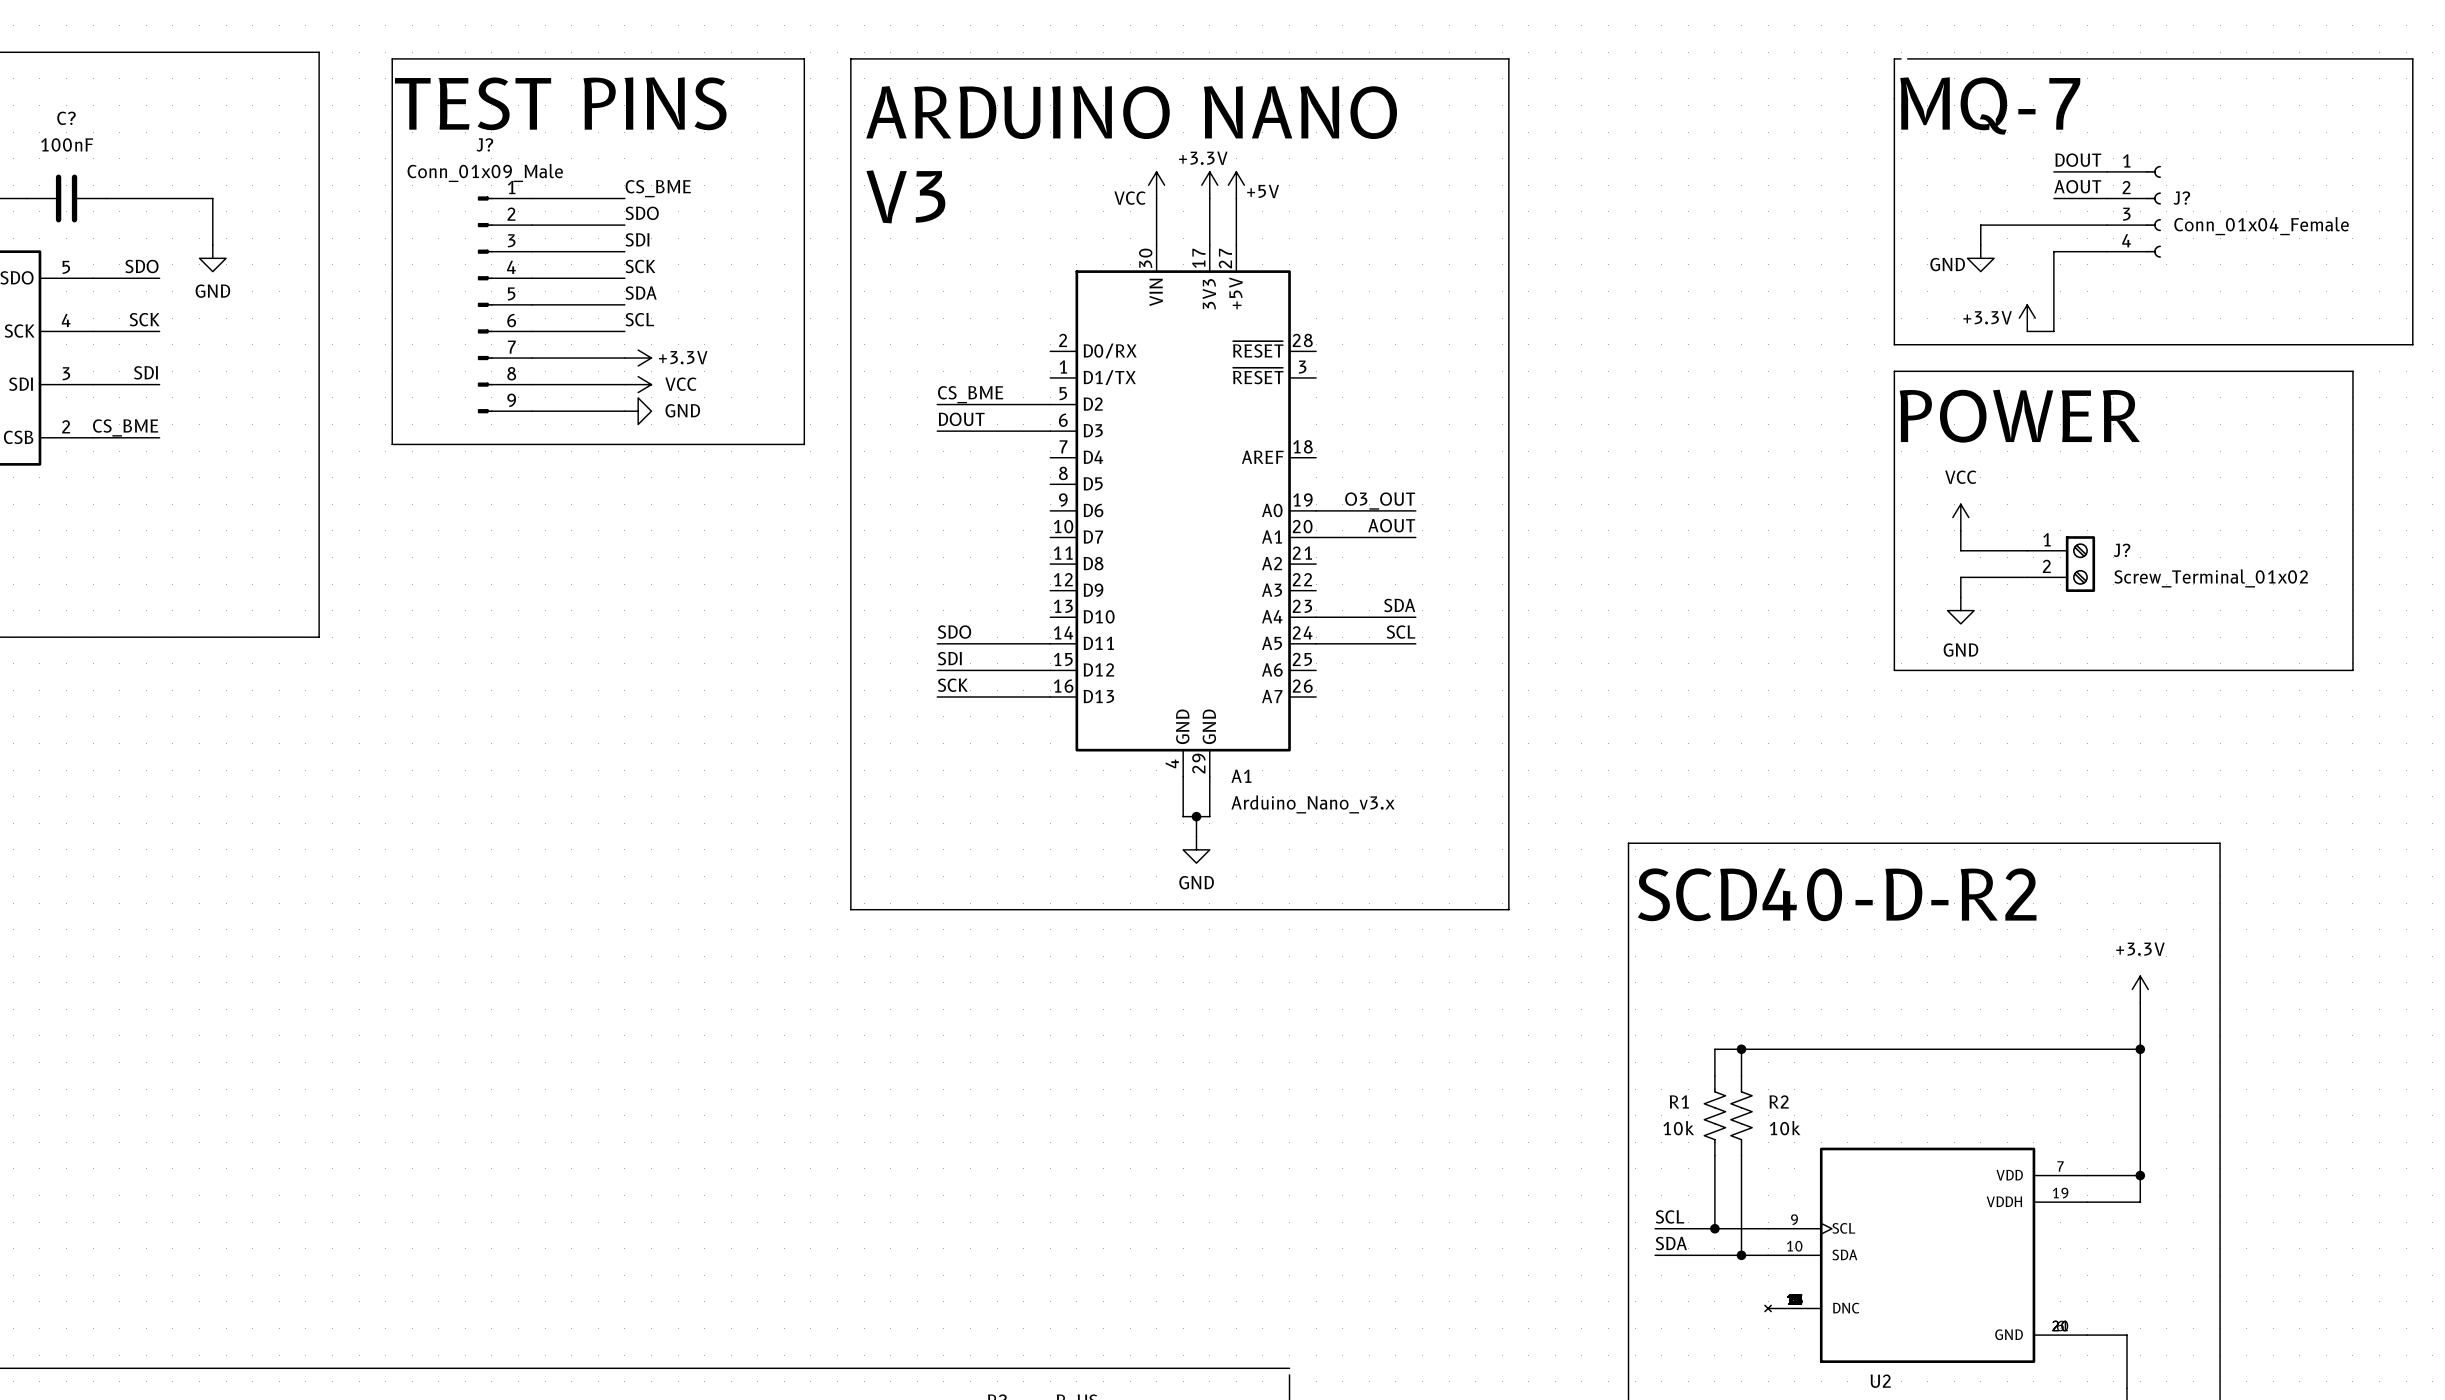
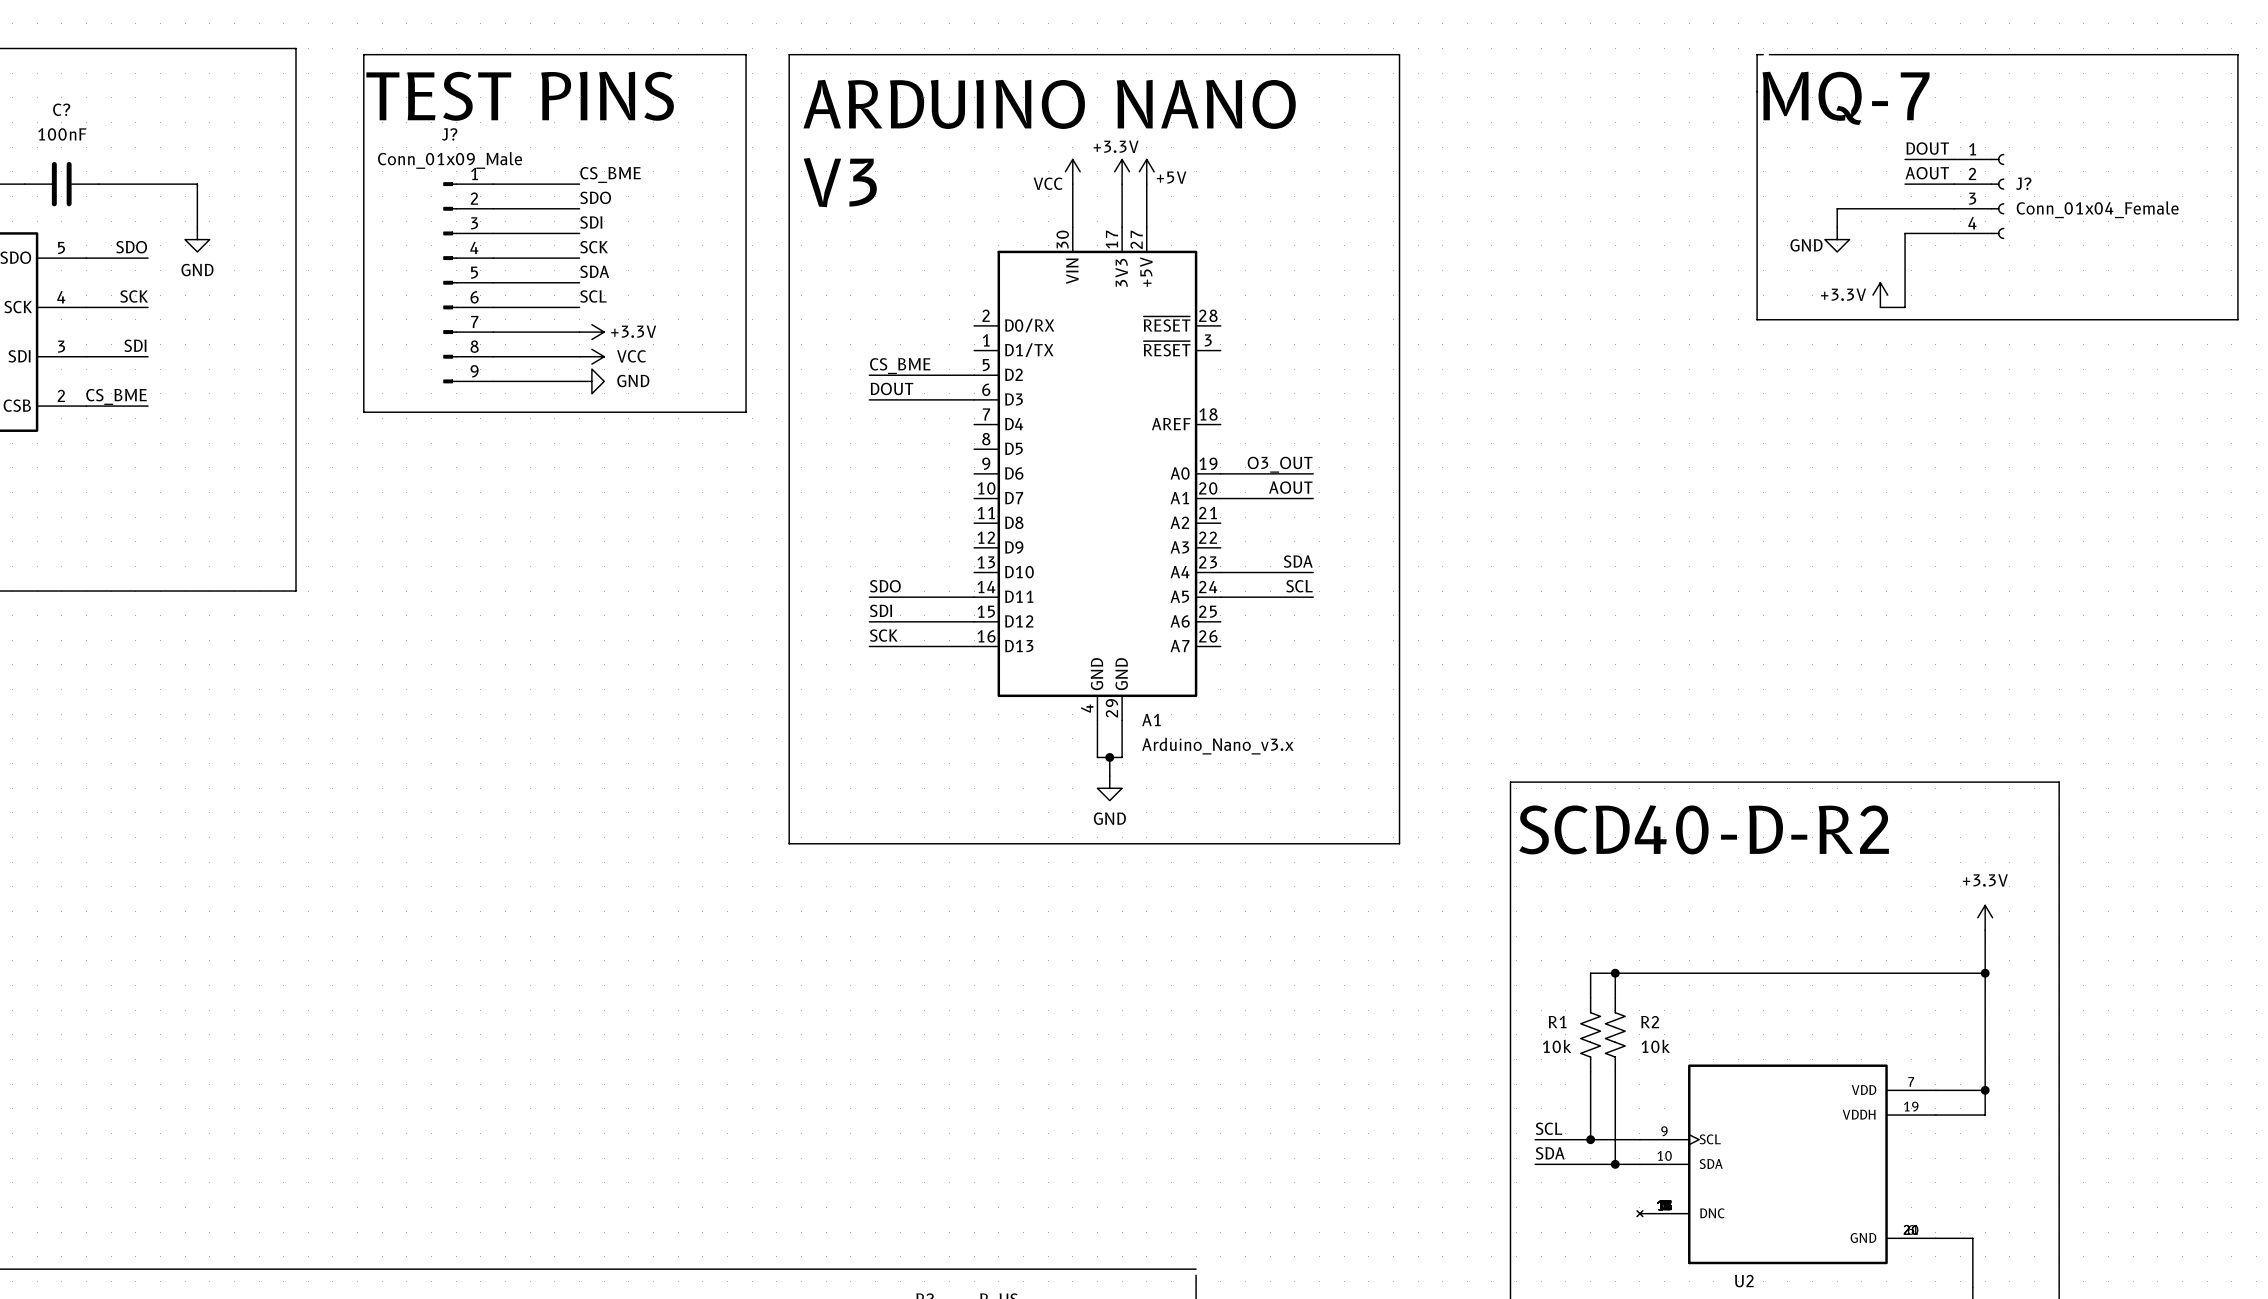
line: (1894, 371) (2352, 371) (2352, 670) (1894, 670) (1894, 371) -> none
text: POWER (2019, 416) -> none
power symbol: VCC (1960, 517) -> none
wire: (1960, 530) (1960, 550) (2027, 550) -> none
J?: Screw_Terminal_01x02 (2061, 564) -> none
wire: (2027, 577) (1960, 577) (1960, 597) -> none
power symbol: GND (1960, 610) -> none

